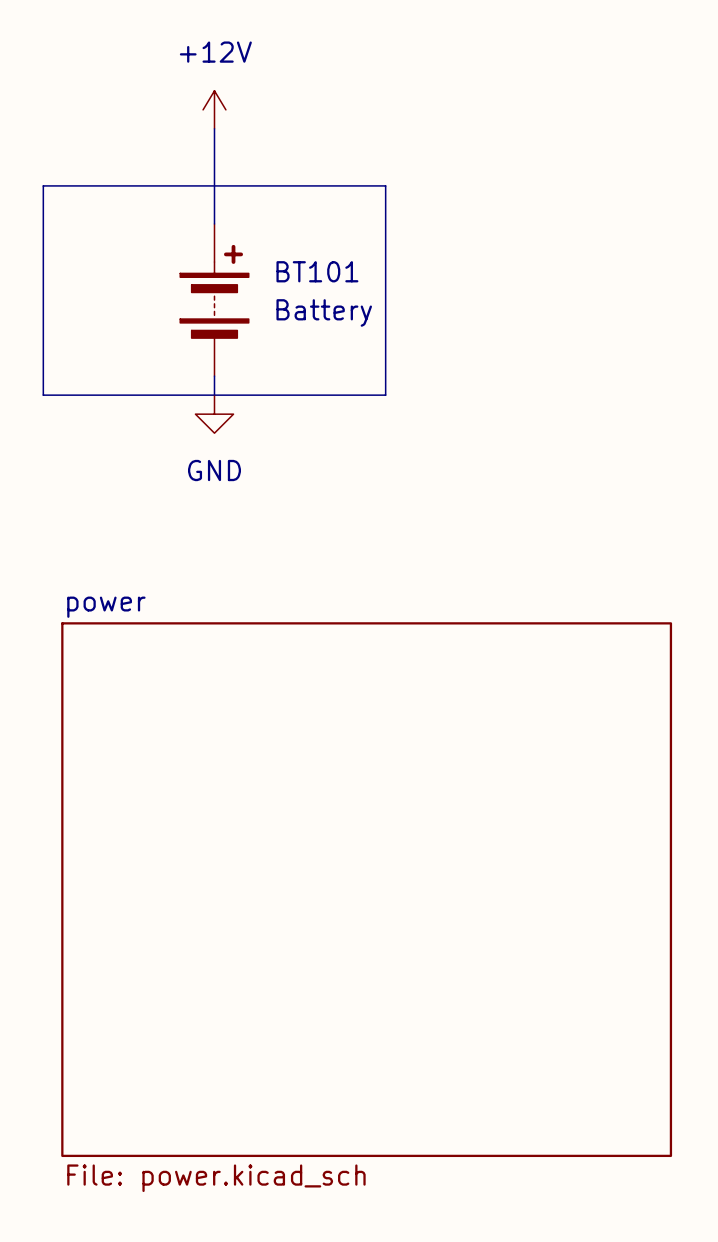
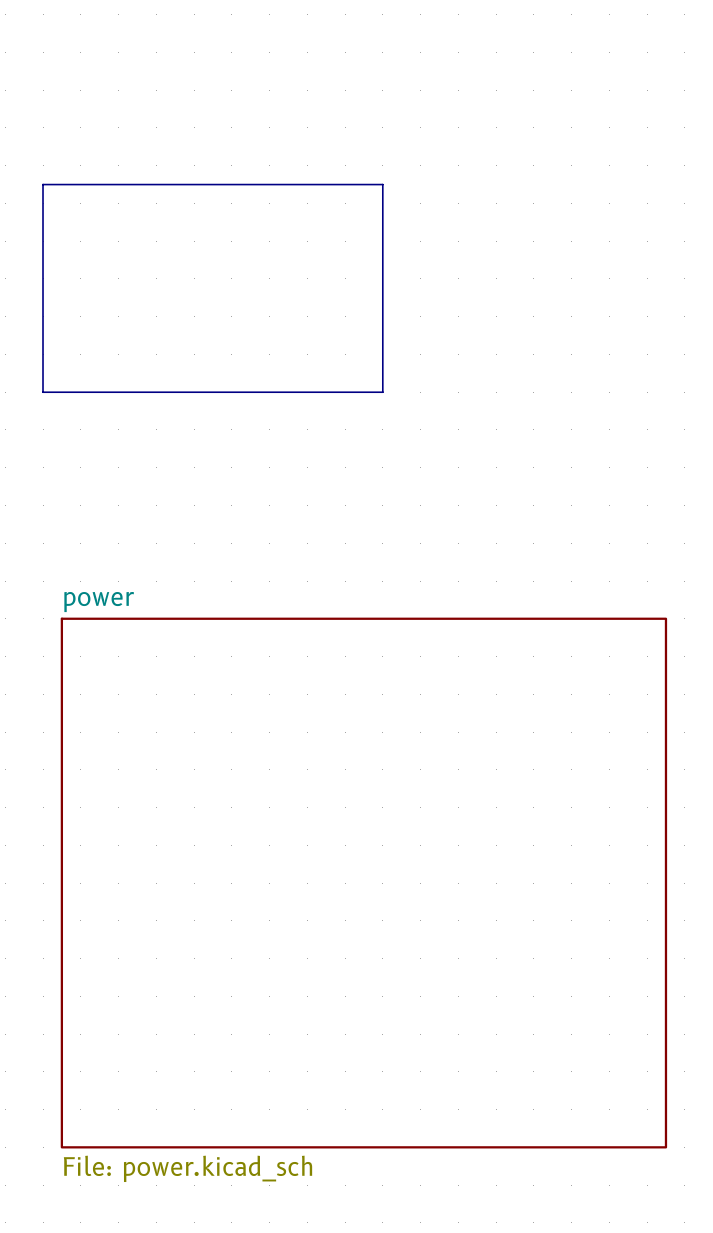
power symbol: +12V (214, 109) -> none
wire: (214, 128) (214, 223) -> none
BT101: Battery (214, 300) -> none
wire: (214, 376) (214, 395) -> none
power symbol: GND (214, 414) -> none

